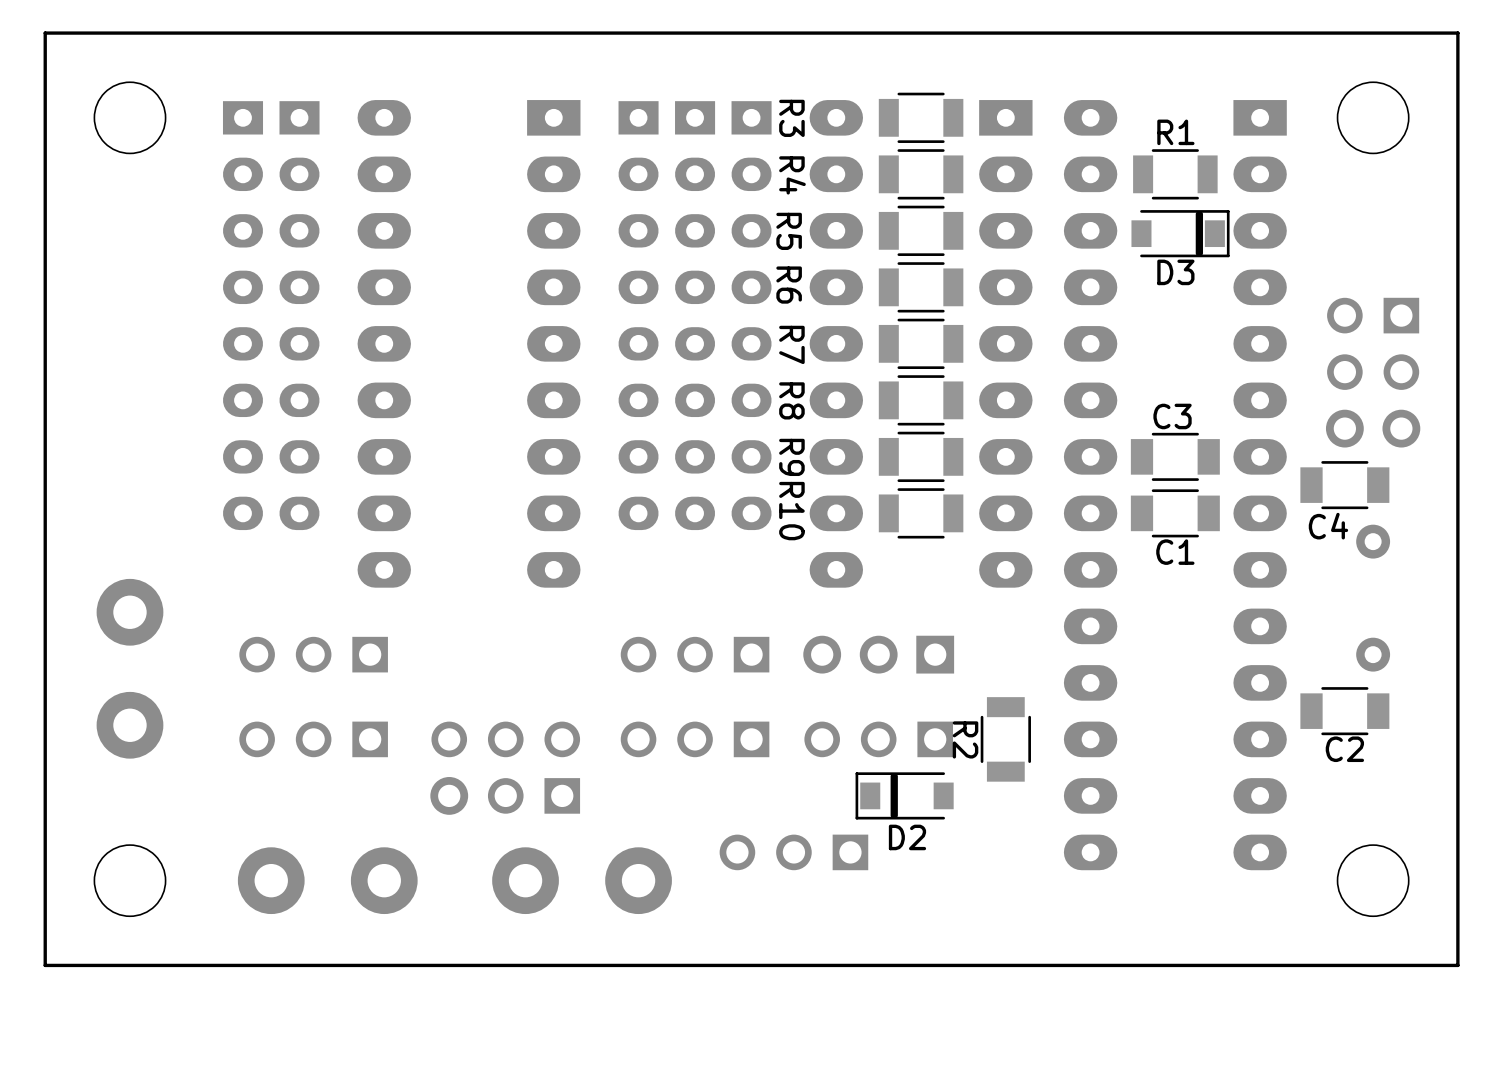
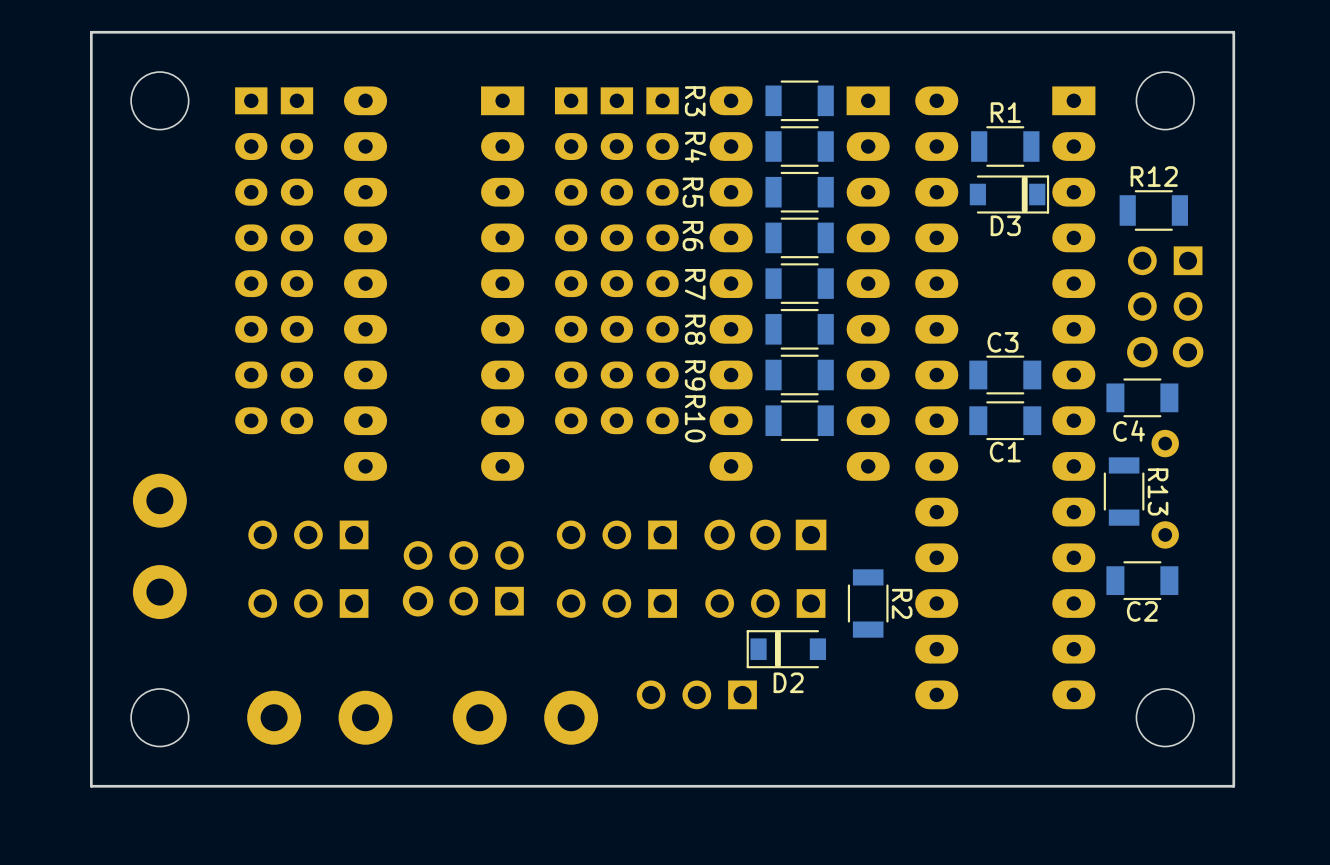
R12: none -> (1153, 210)
R13: none -> (1124, 491)
R2 name position: R2 (965, 739) -> R2 (902, 603)
part position: (505, 768) -> (463, 578)

